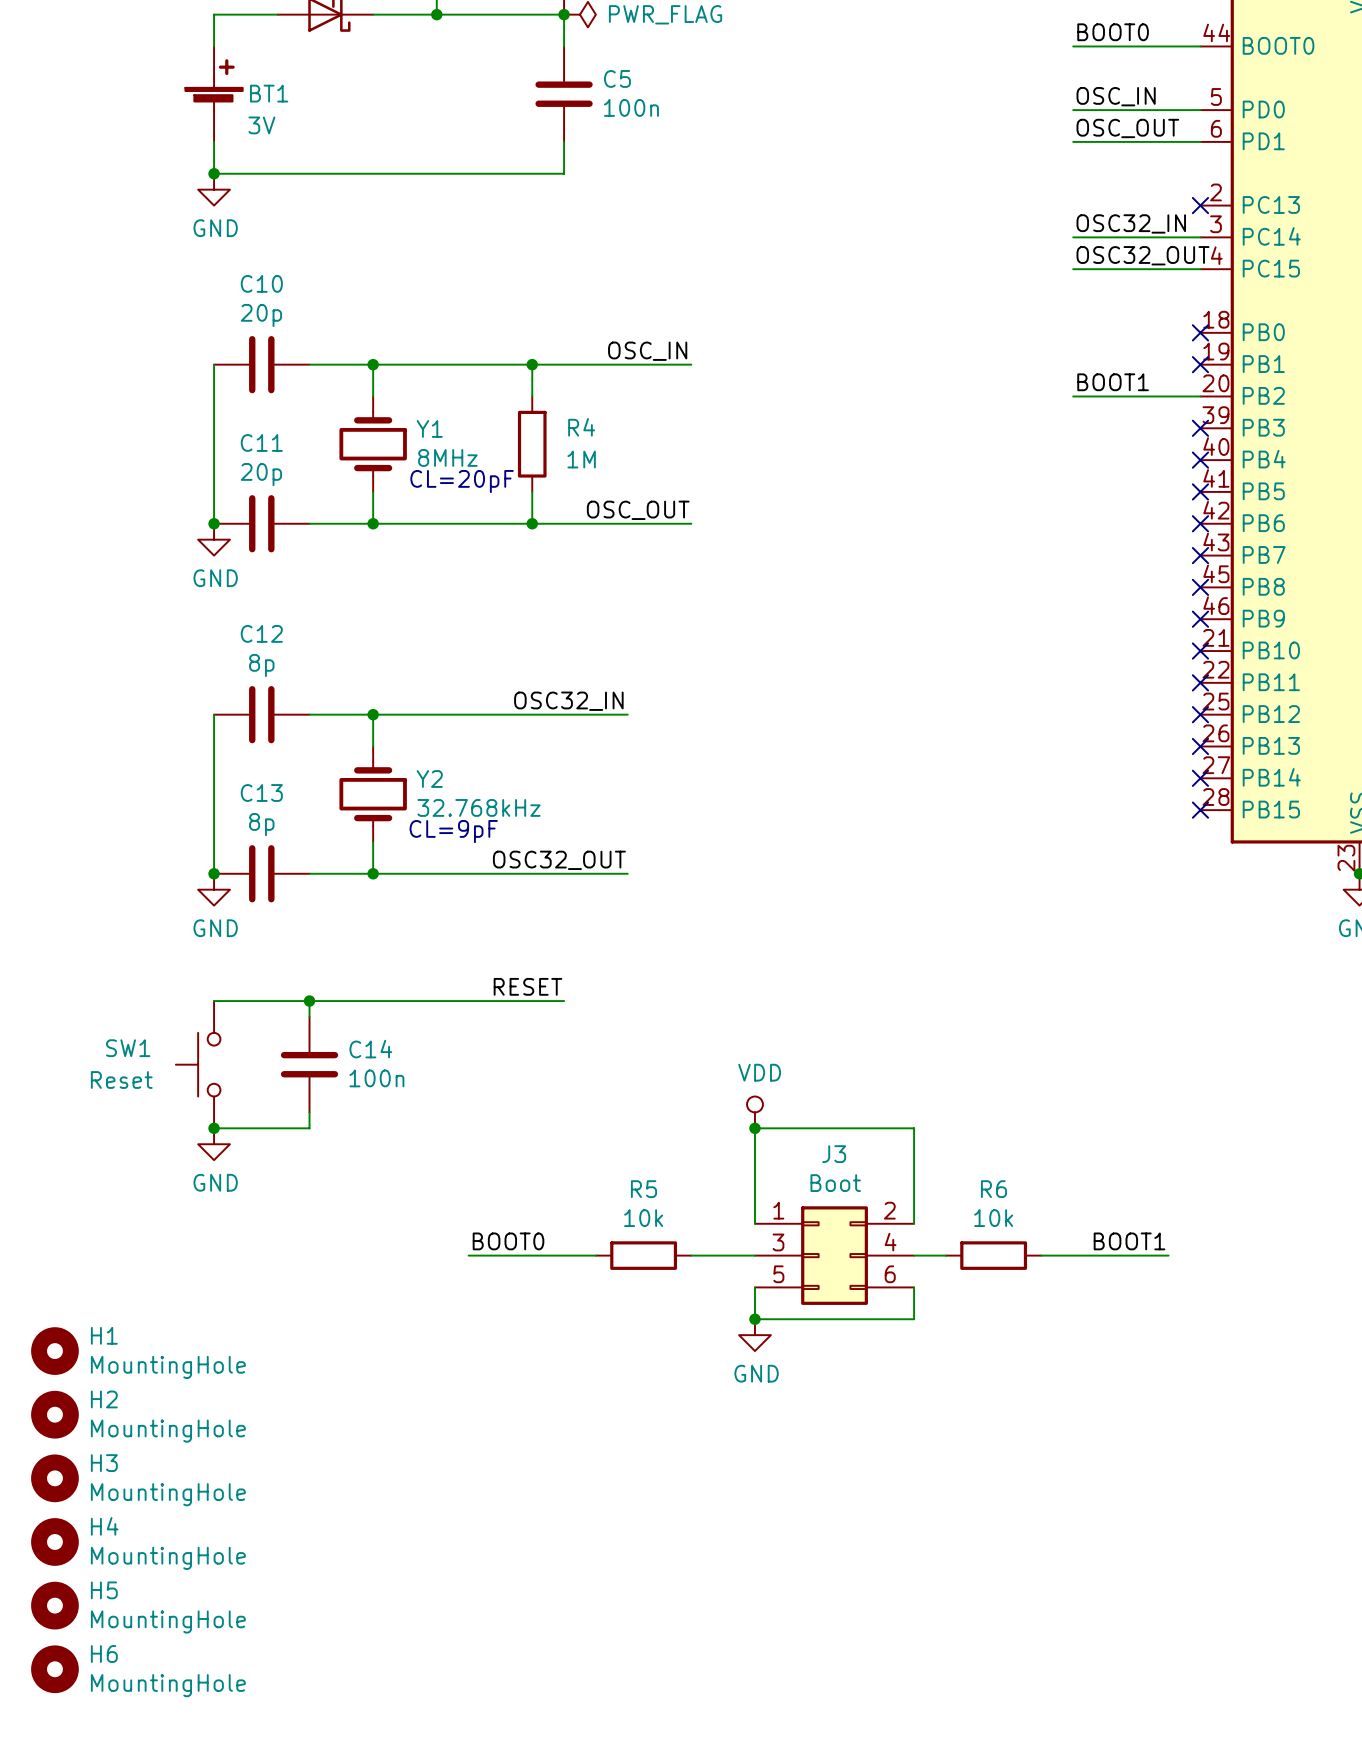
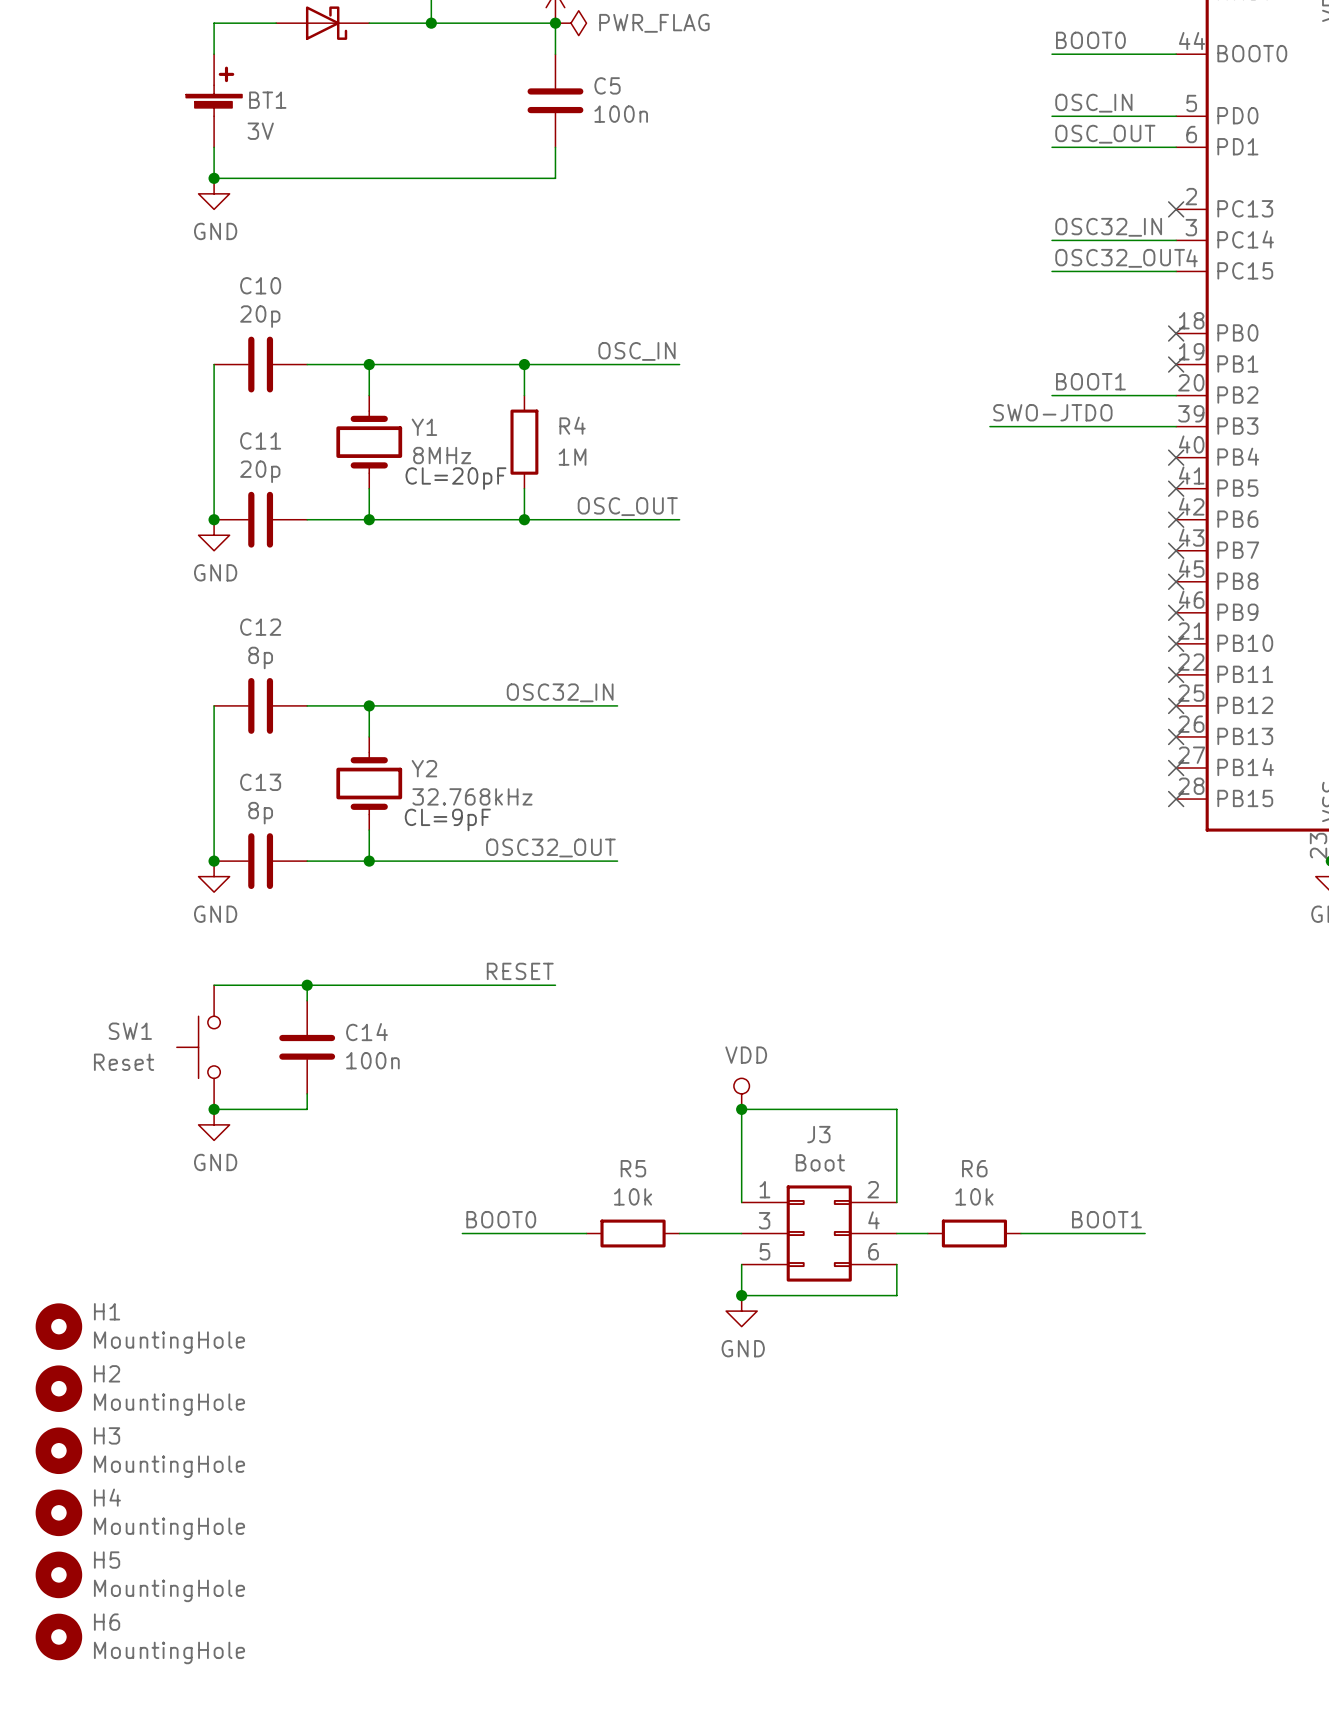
label: none -> SWO-JTDO (1052, 412)
wire: none -> (989, 426) (1176, 426)
no-connect mark: (1200, 428) -> none

